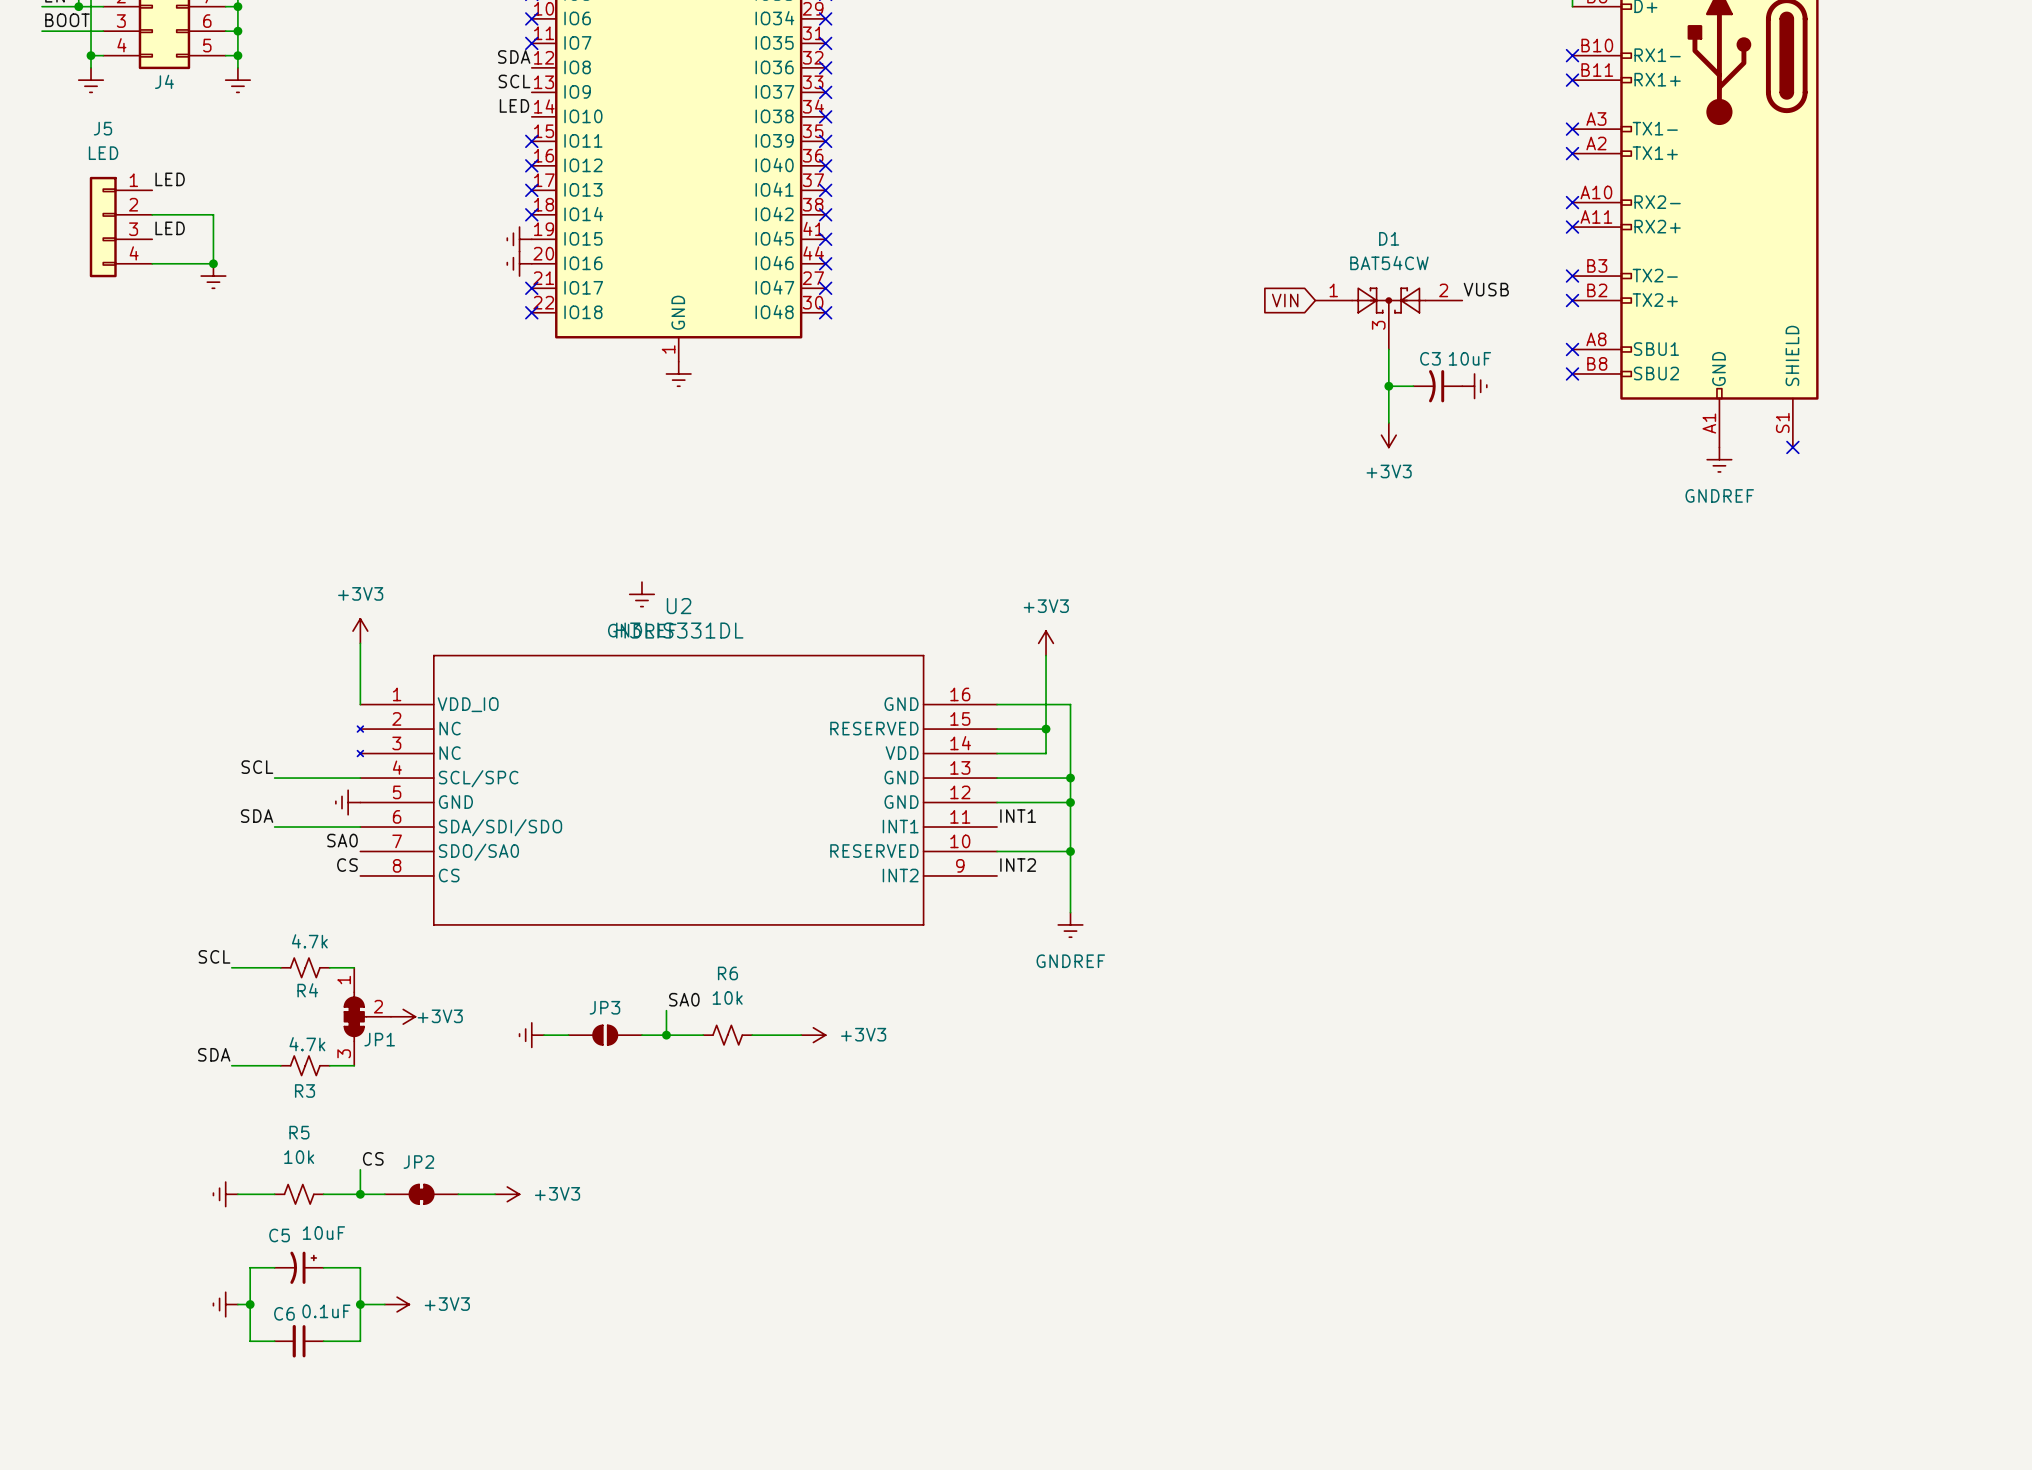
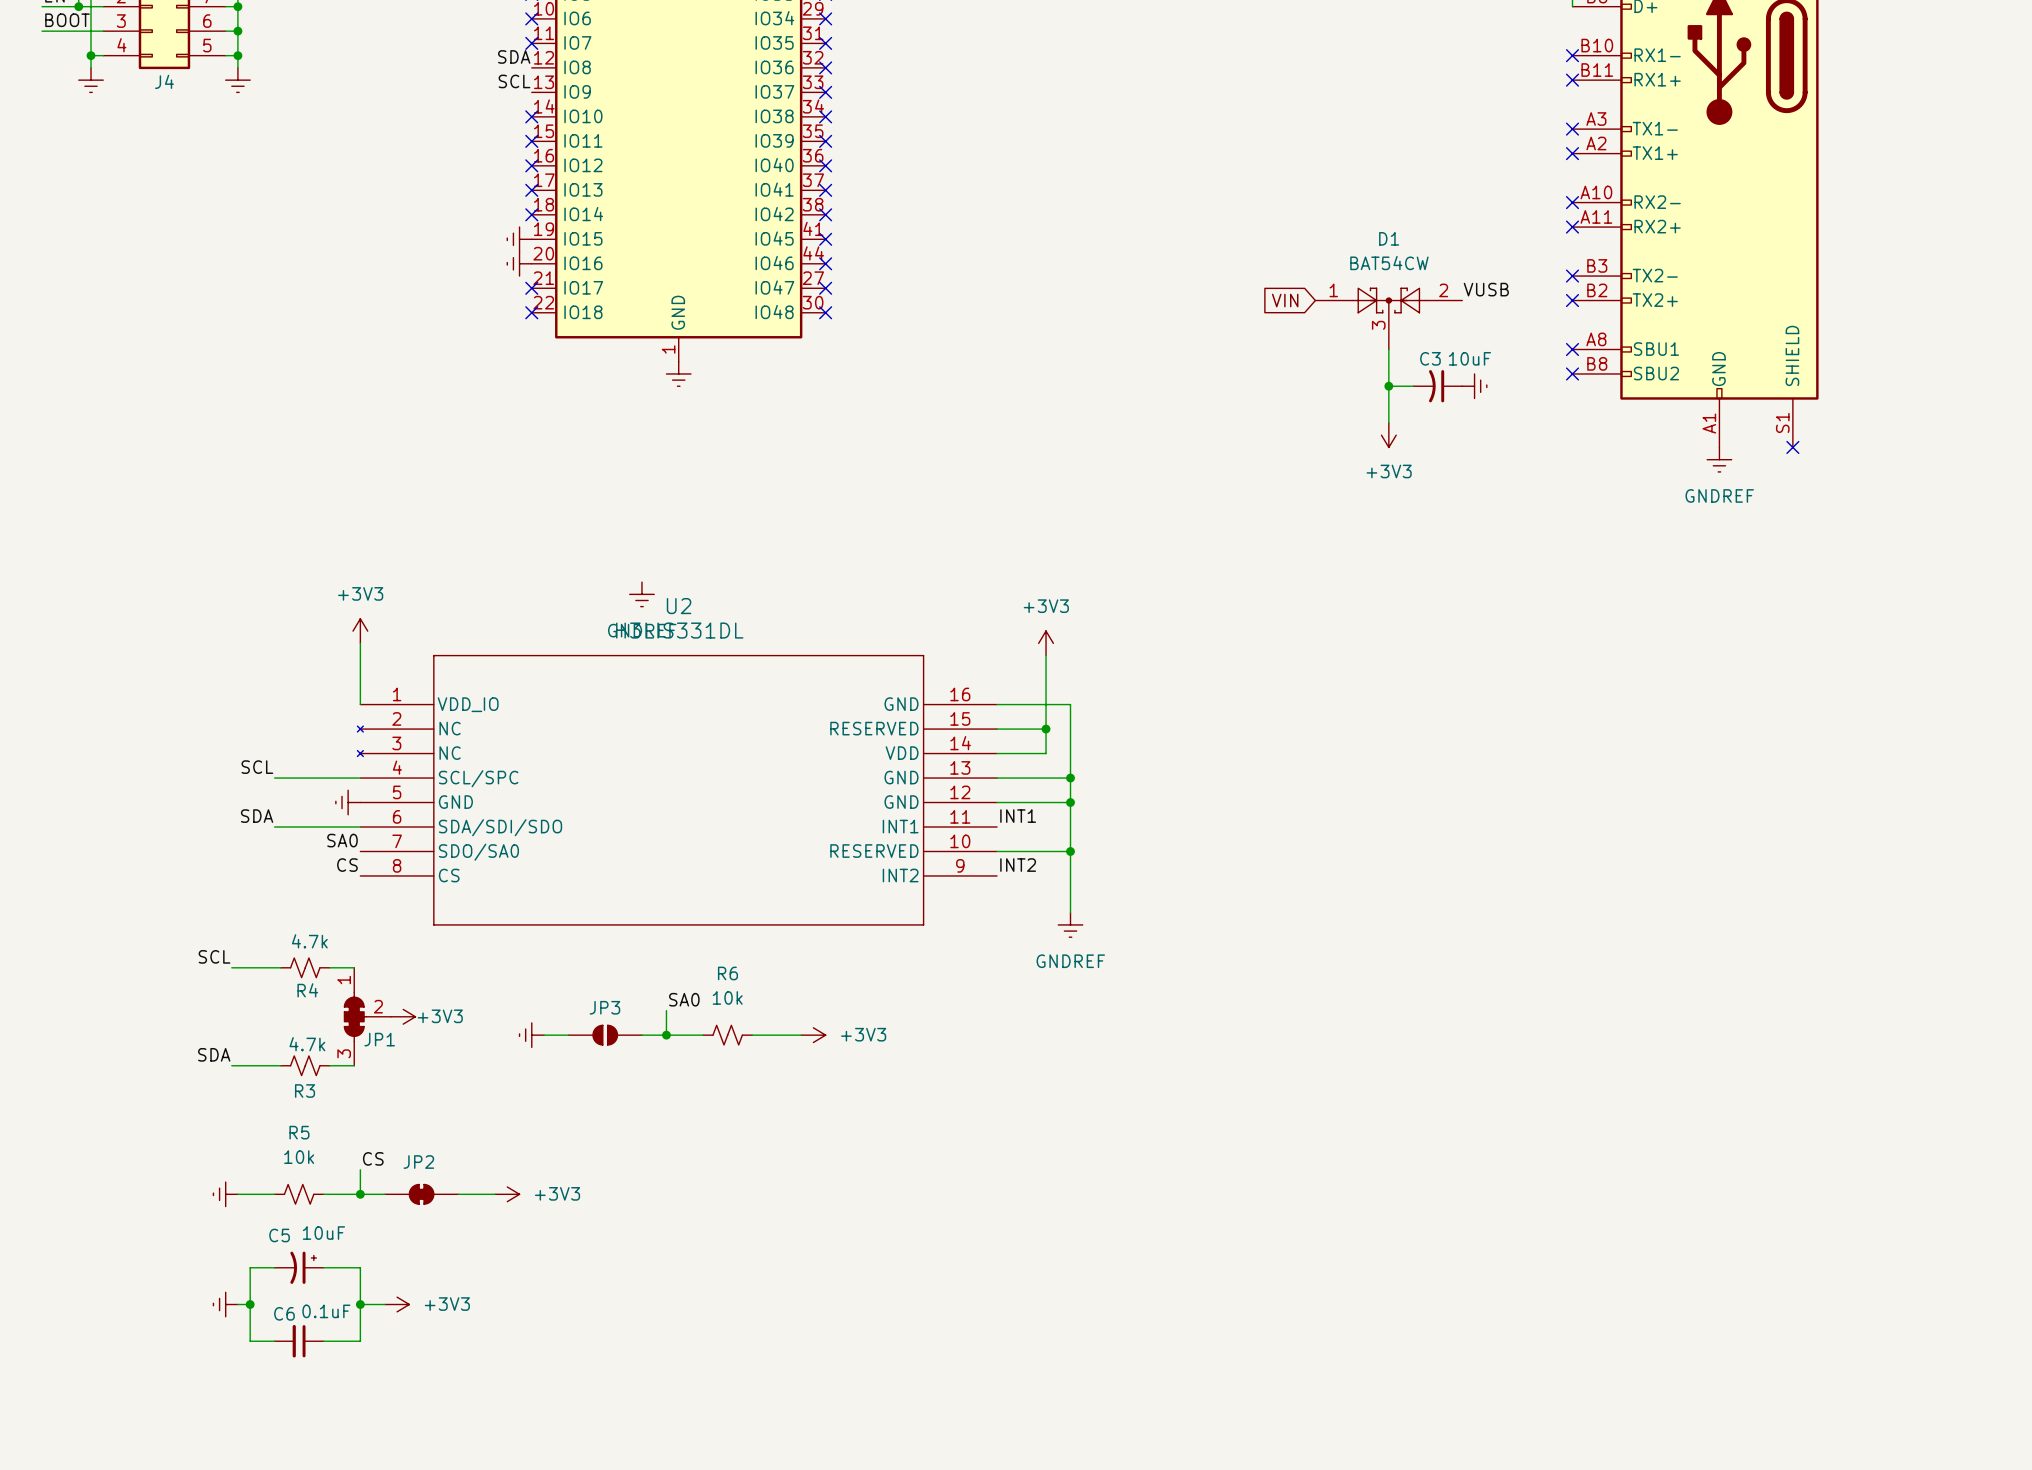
label: LED (514, 105) -> none
no-connect mark: none -> (531, 116)
label: LED (170, 179) -> none
wire: (152, 214) (213, 214) (213, 263) (152, 263) -> none
J5: LED (121, 227) -> none
label: LED (170, 228) -> none
junction: (213, 263) -> none
power symbol: (213, 276) -> none

